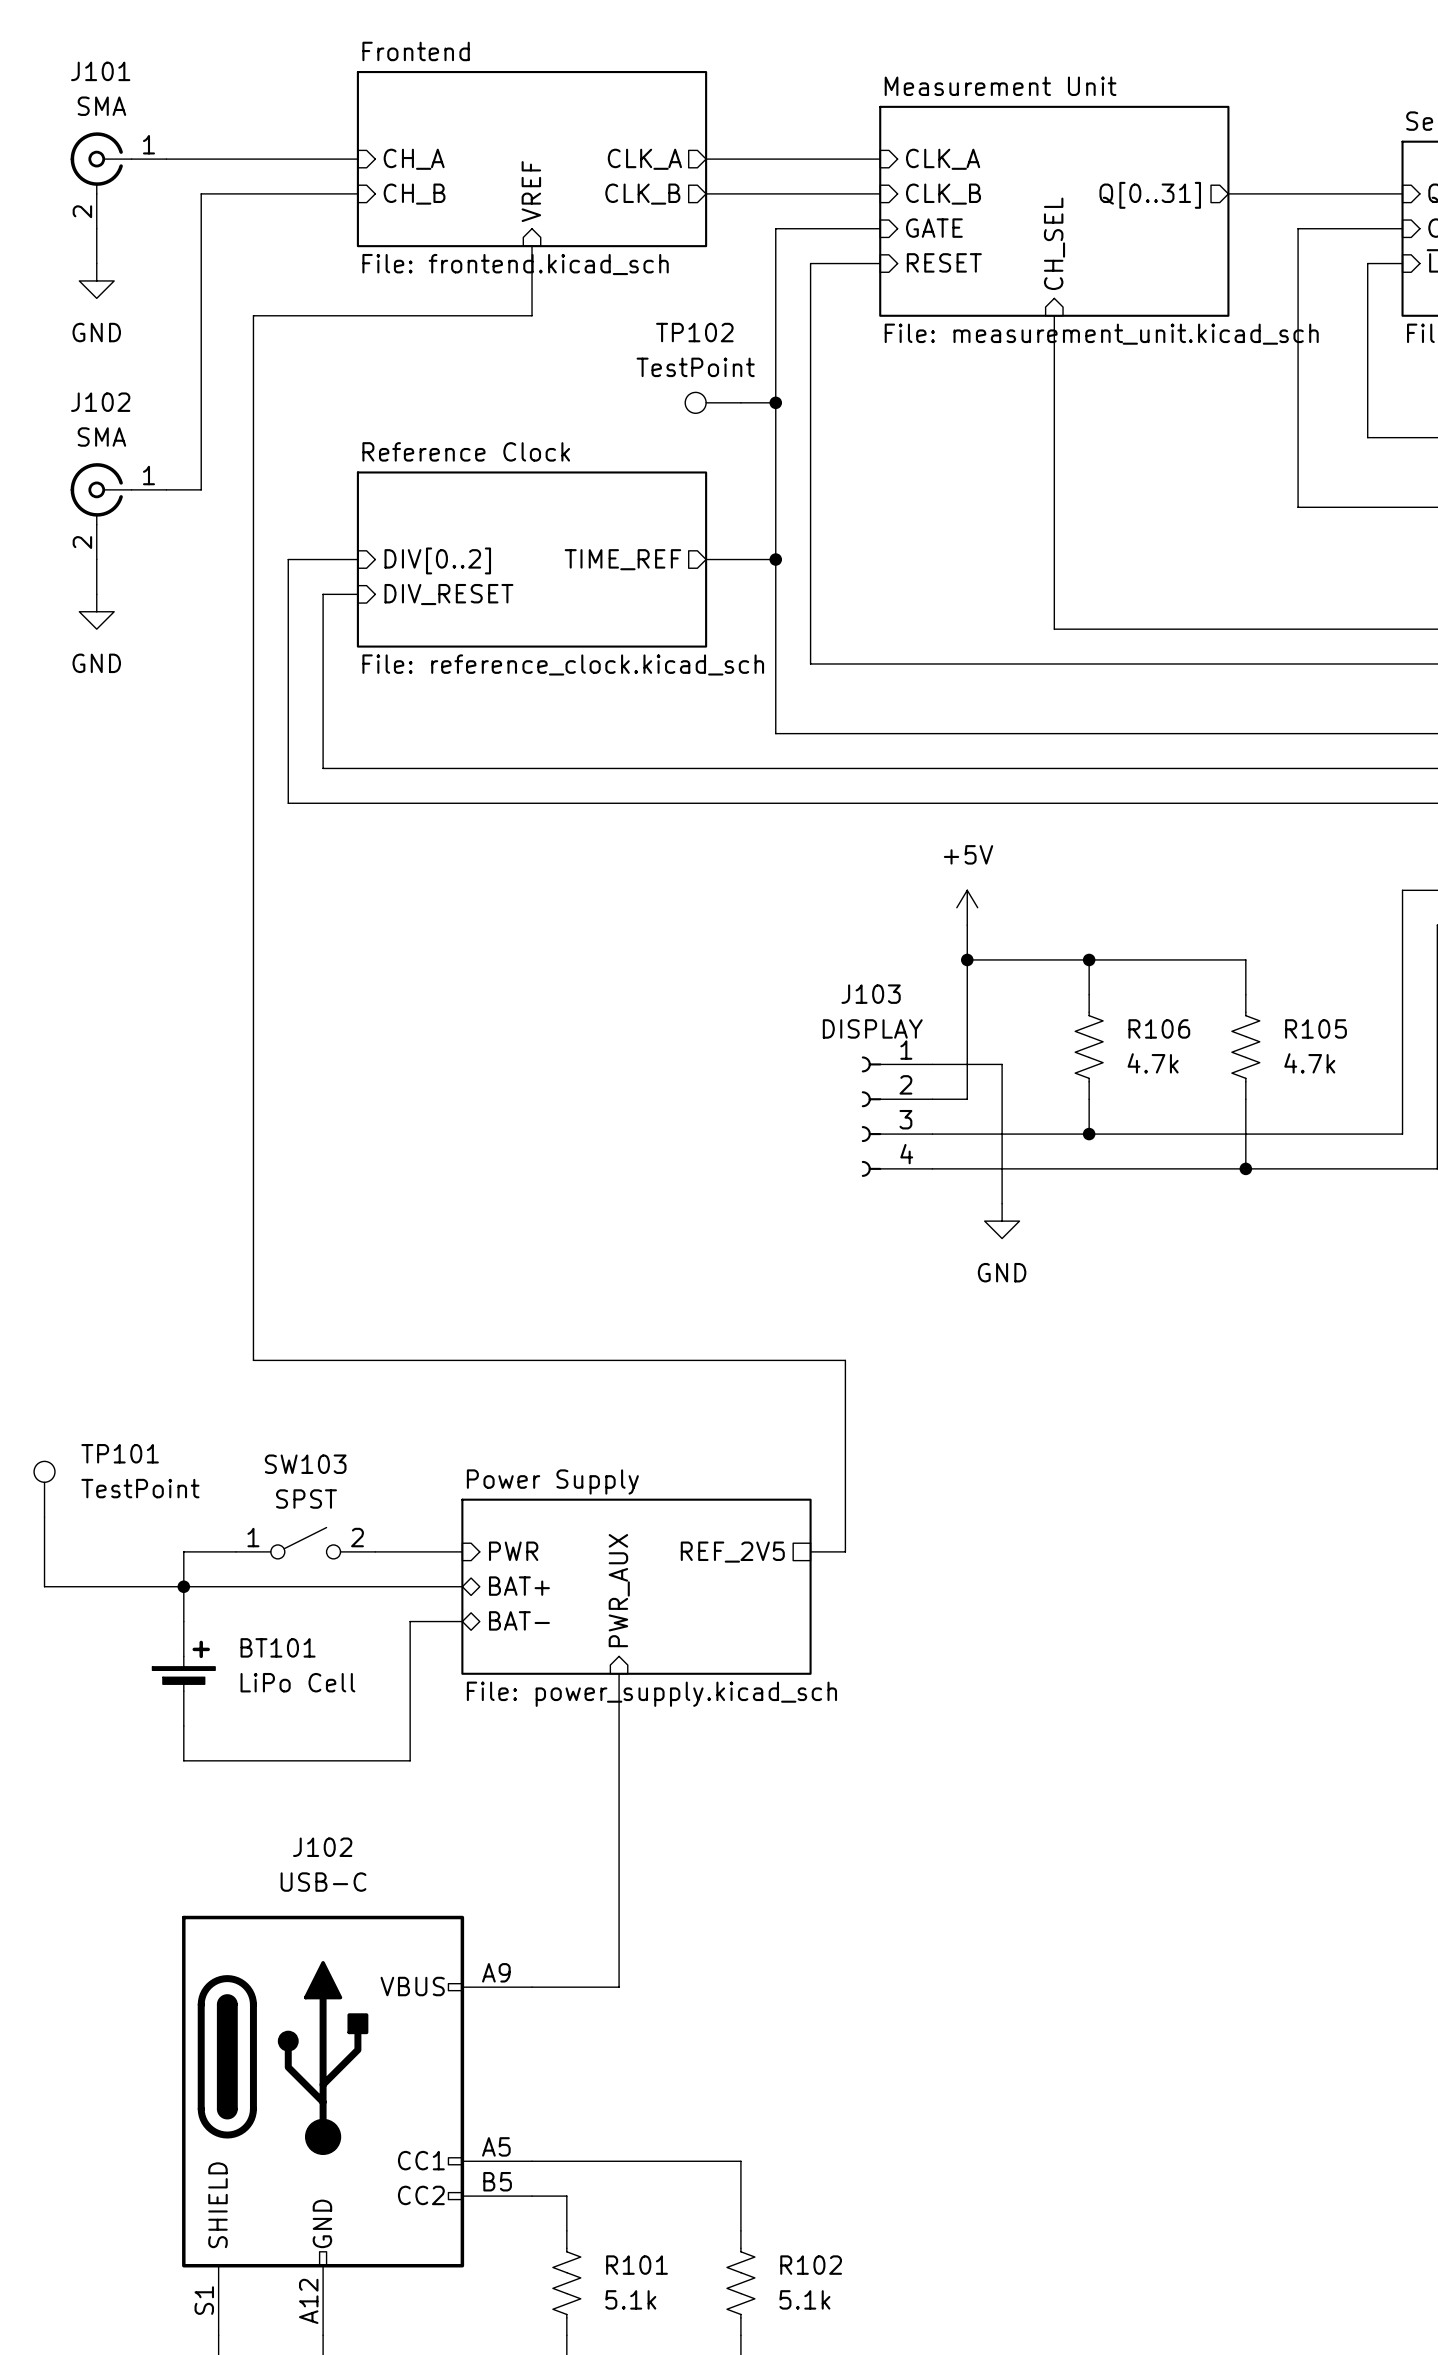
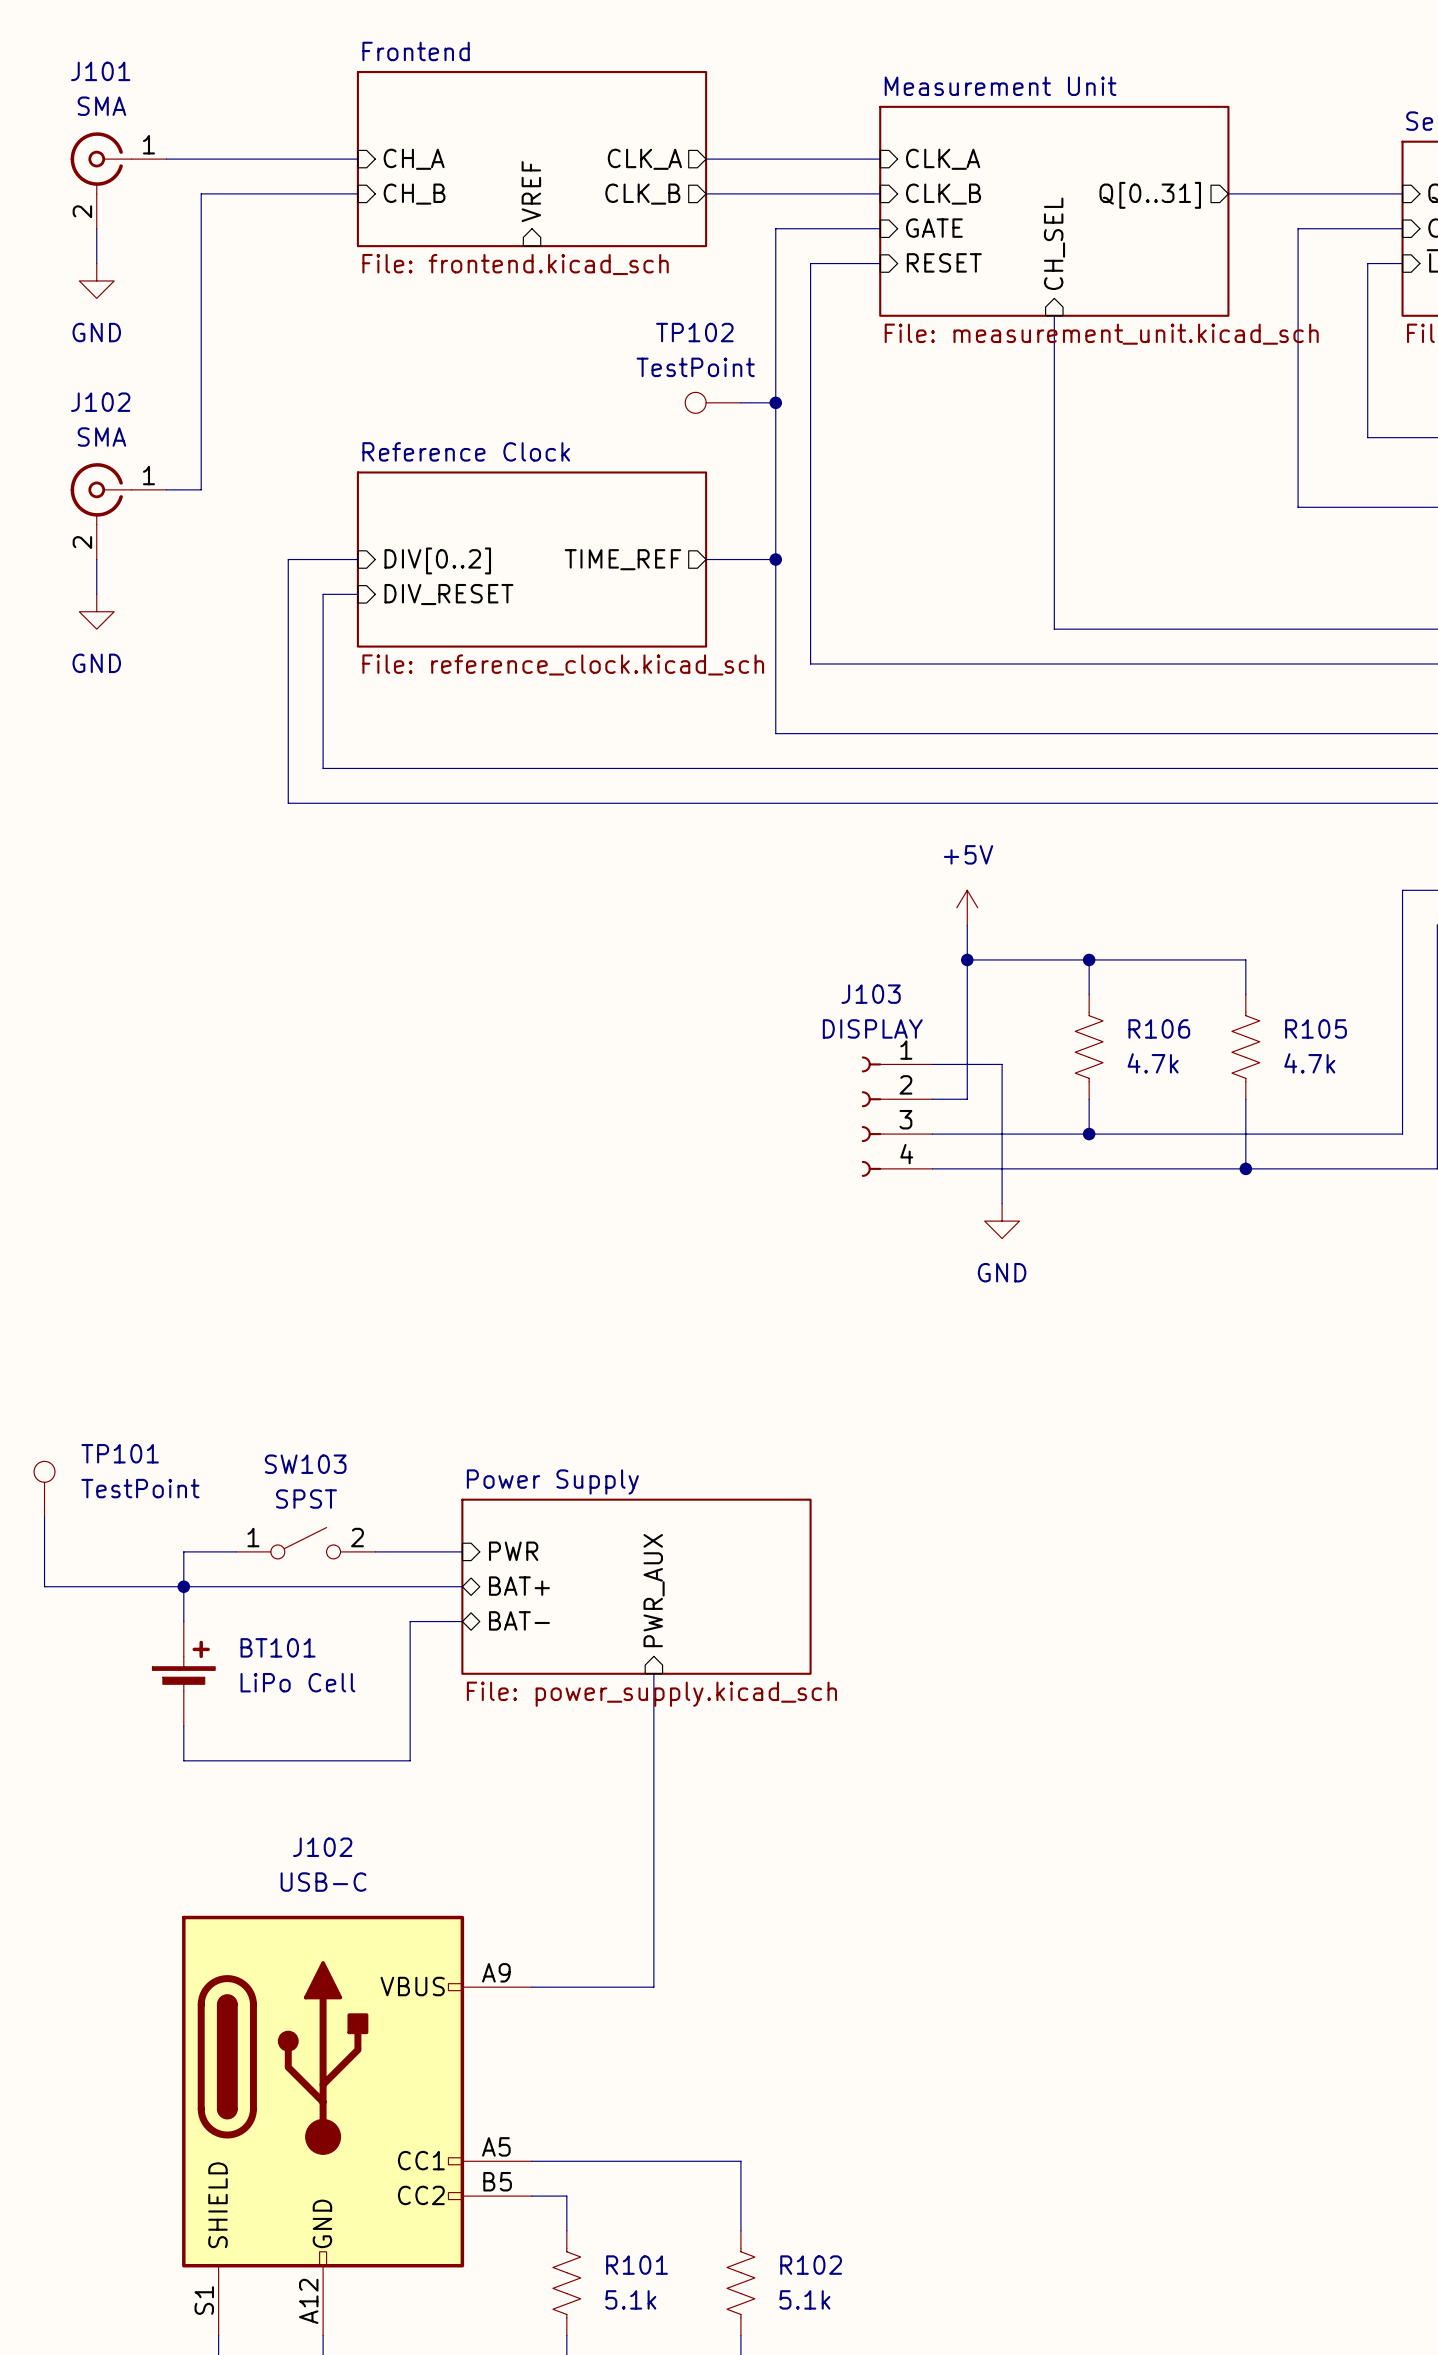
wire: (532, 246) (532, 315) (253, 315) (253, 1360) (845, 1360) (845, 1551) (810, 1551) -> none
sheet pin: REF_2V5 (732, 1552) -> none
sheet pin position: PWR_AUX (619, 1590) -> PWR_AUX (654, 1590)
wire: (619, 1673) (619, 1987) -> (653, 1673) (653, 1987) (619, 1987)

